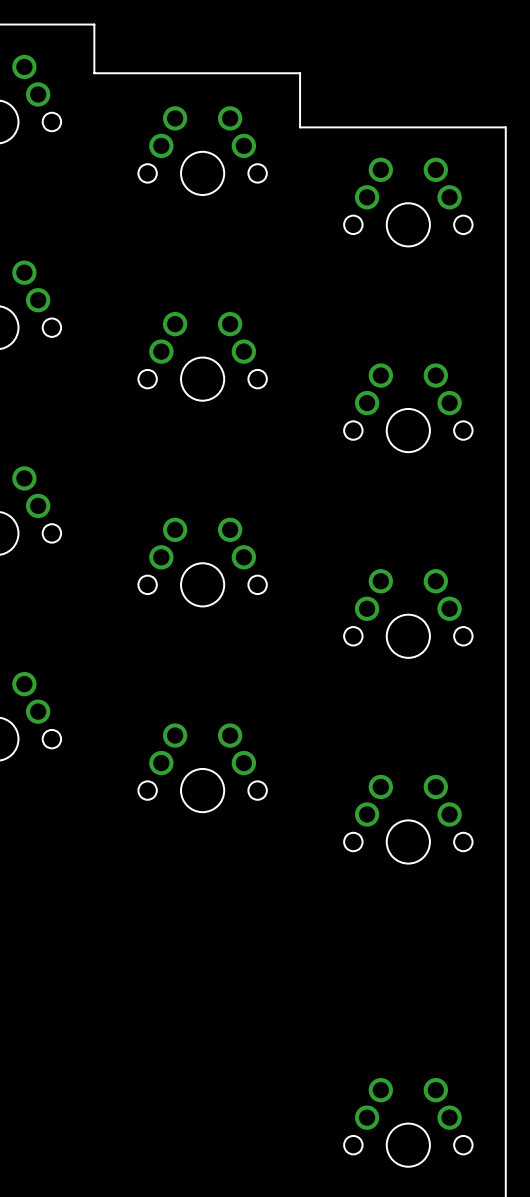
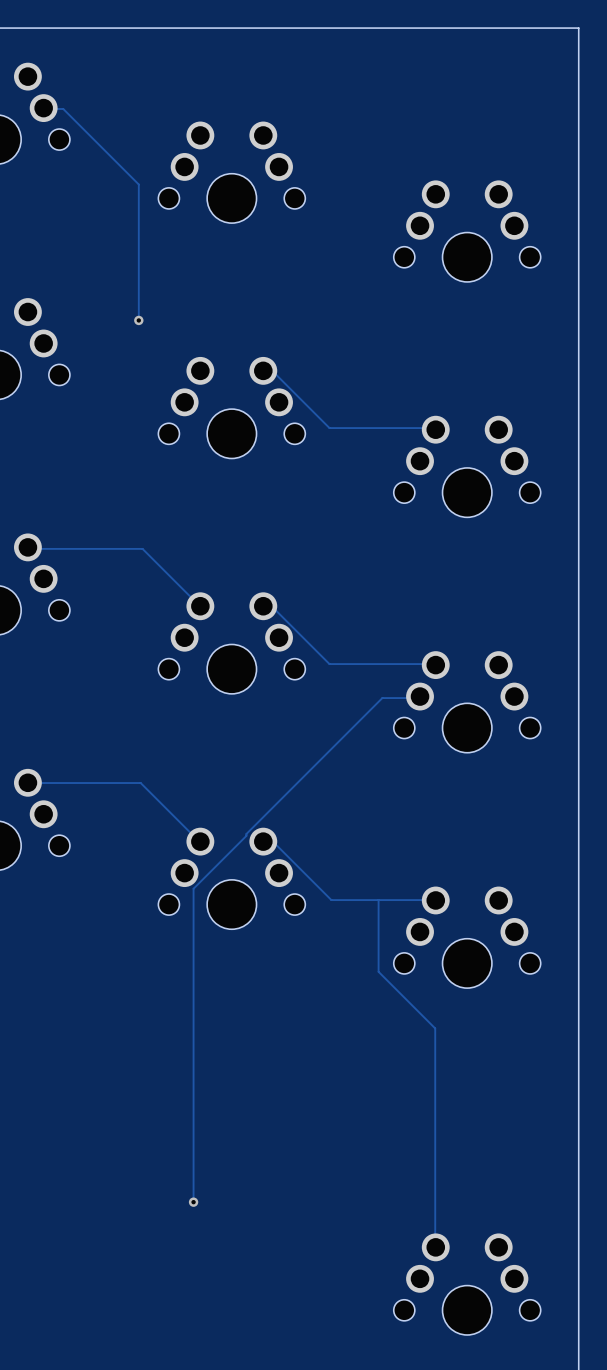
board edge: (94, 24) (94, 73) (300, 73) (300, 127) (505, 127) -> (107, 28) (578, 28) (578, 145)
track: none -> (43, 108) (63, 108) (138, 184) (138, 320)
via: none -> (138, 320)
track: none -> (263, 370) (272, 371) (329, 428) (435, 428) (435, 429)
track: none -> (27, 547) (142, 548) (200, 606)
track: none -> (263, 606) (272, 607) (329, 664) (435, 665)
track: none -> (420, 696) (382, 698) (193, 888) (193, 1202)
track: none -> (27, 782) (140, 783) (200, 841)
track: none -> (263, 841) (263, 843) (274, 843) (331, 900) (435, 900)
track: none -> (378, 900) (378, 971) (435, 1028) (435, 1247)
via: none -> (193, 1202)

